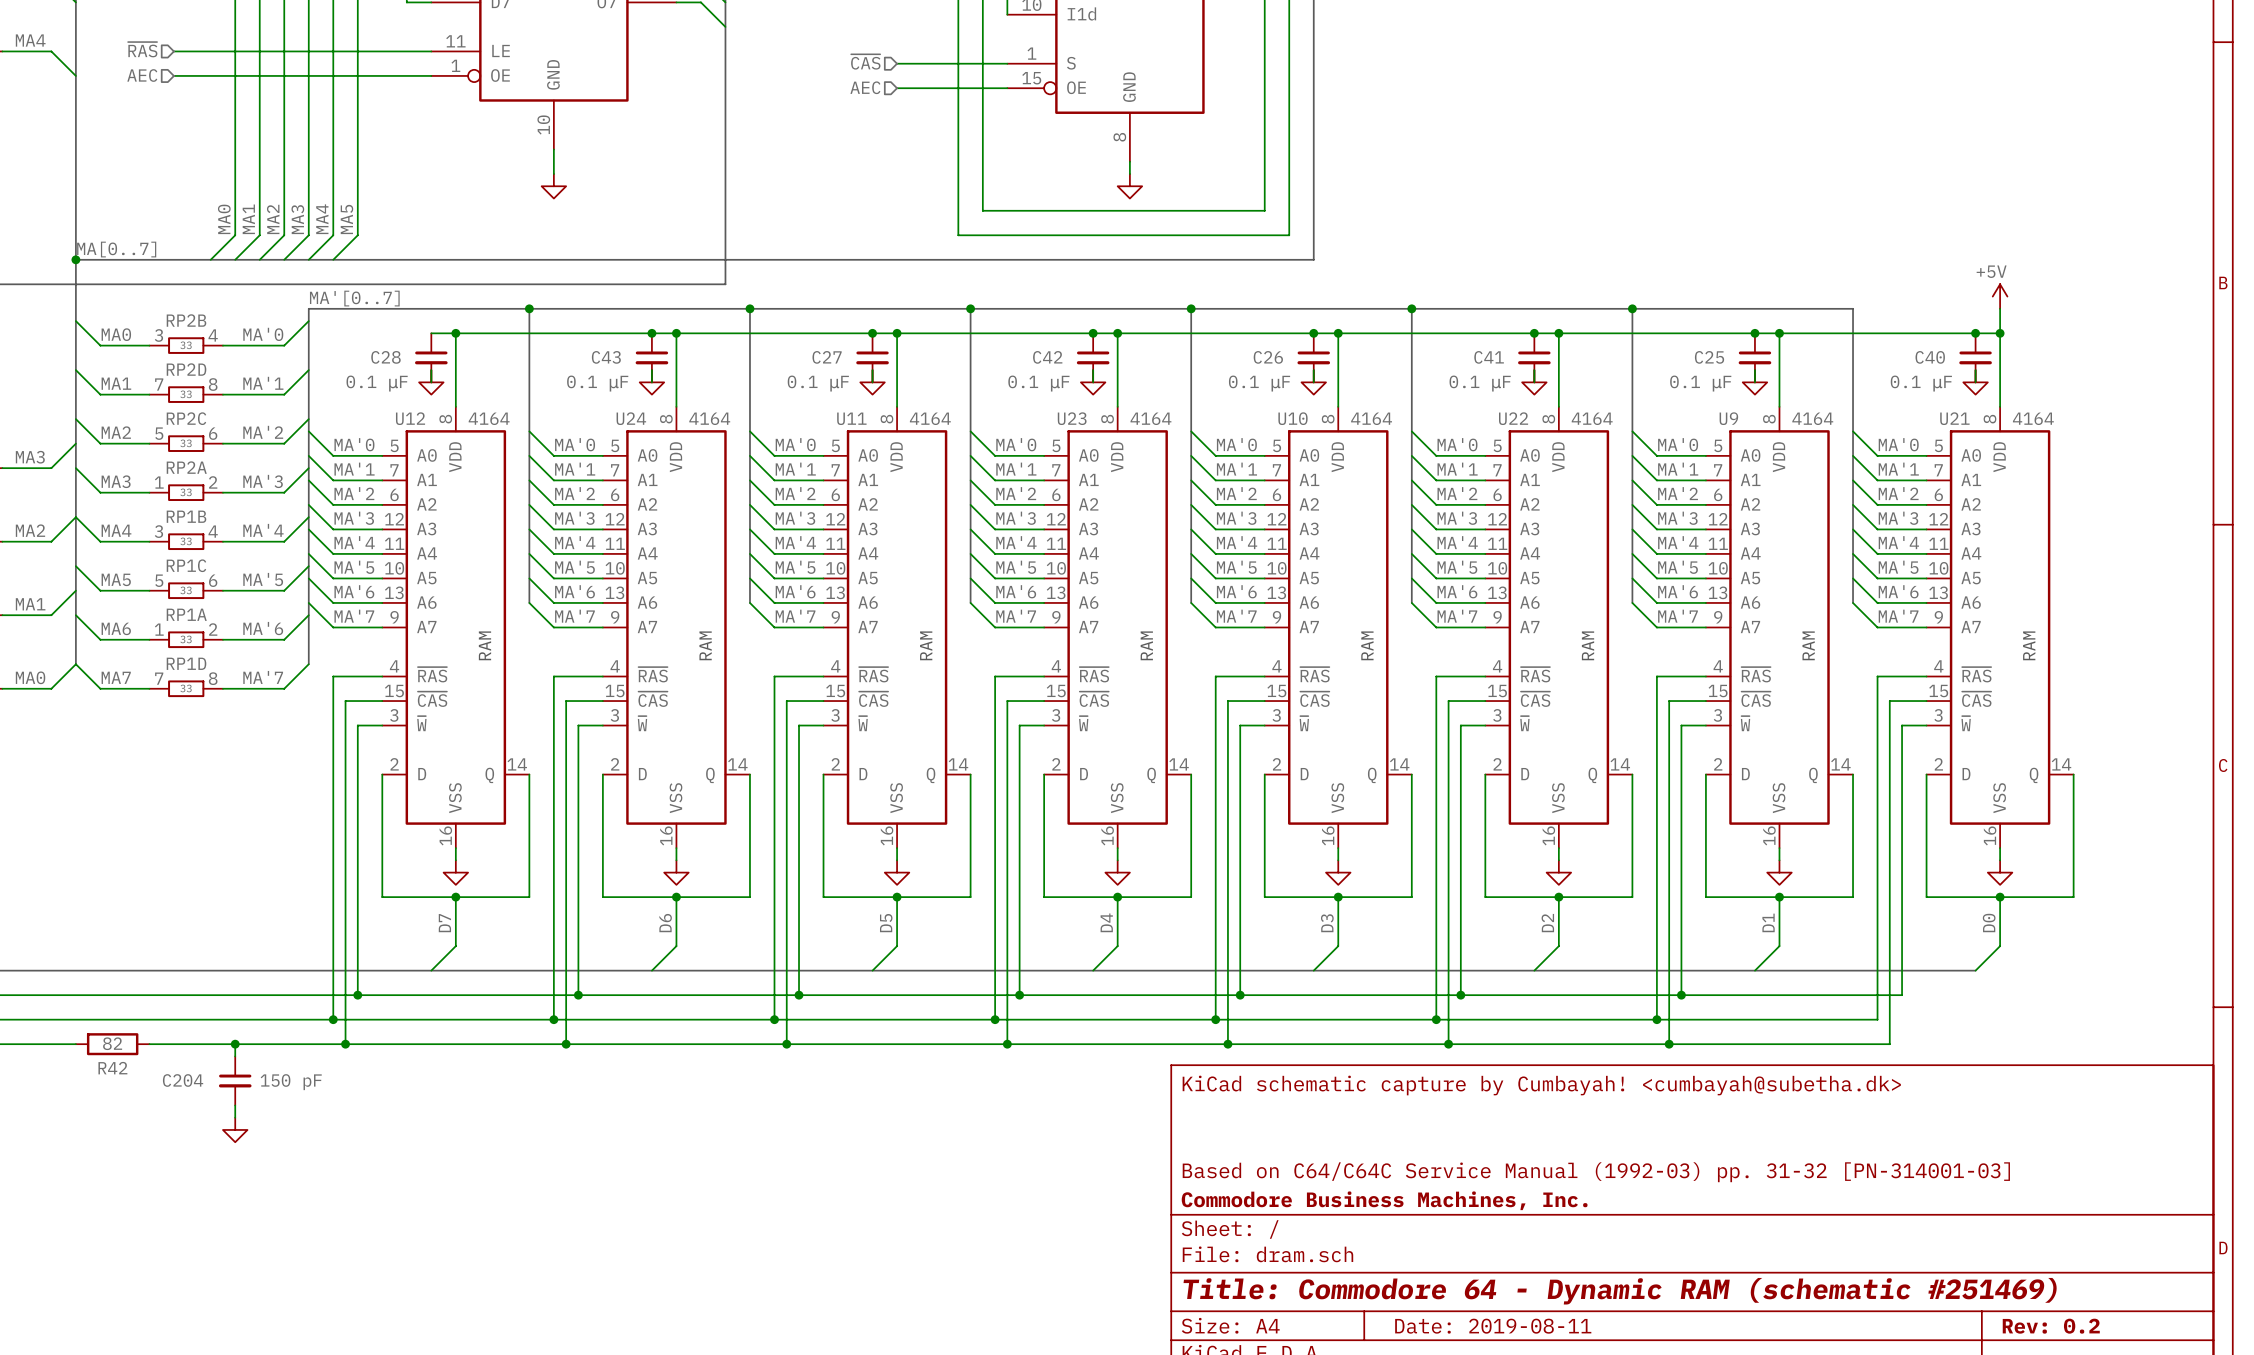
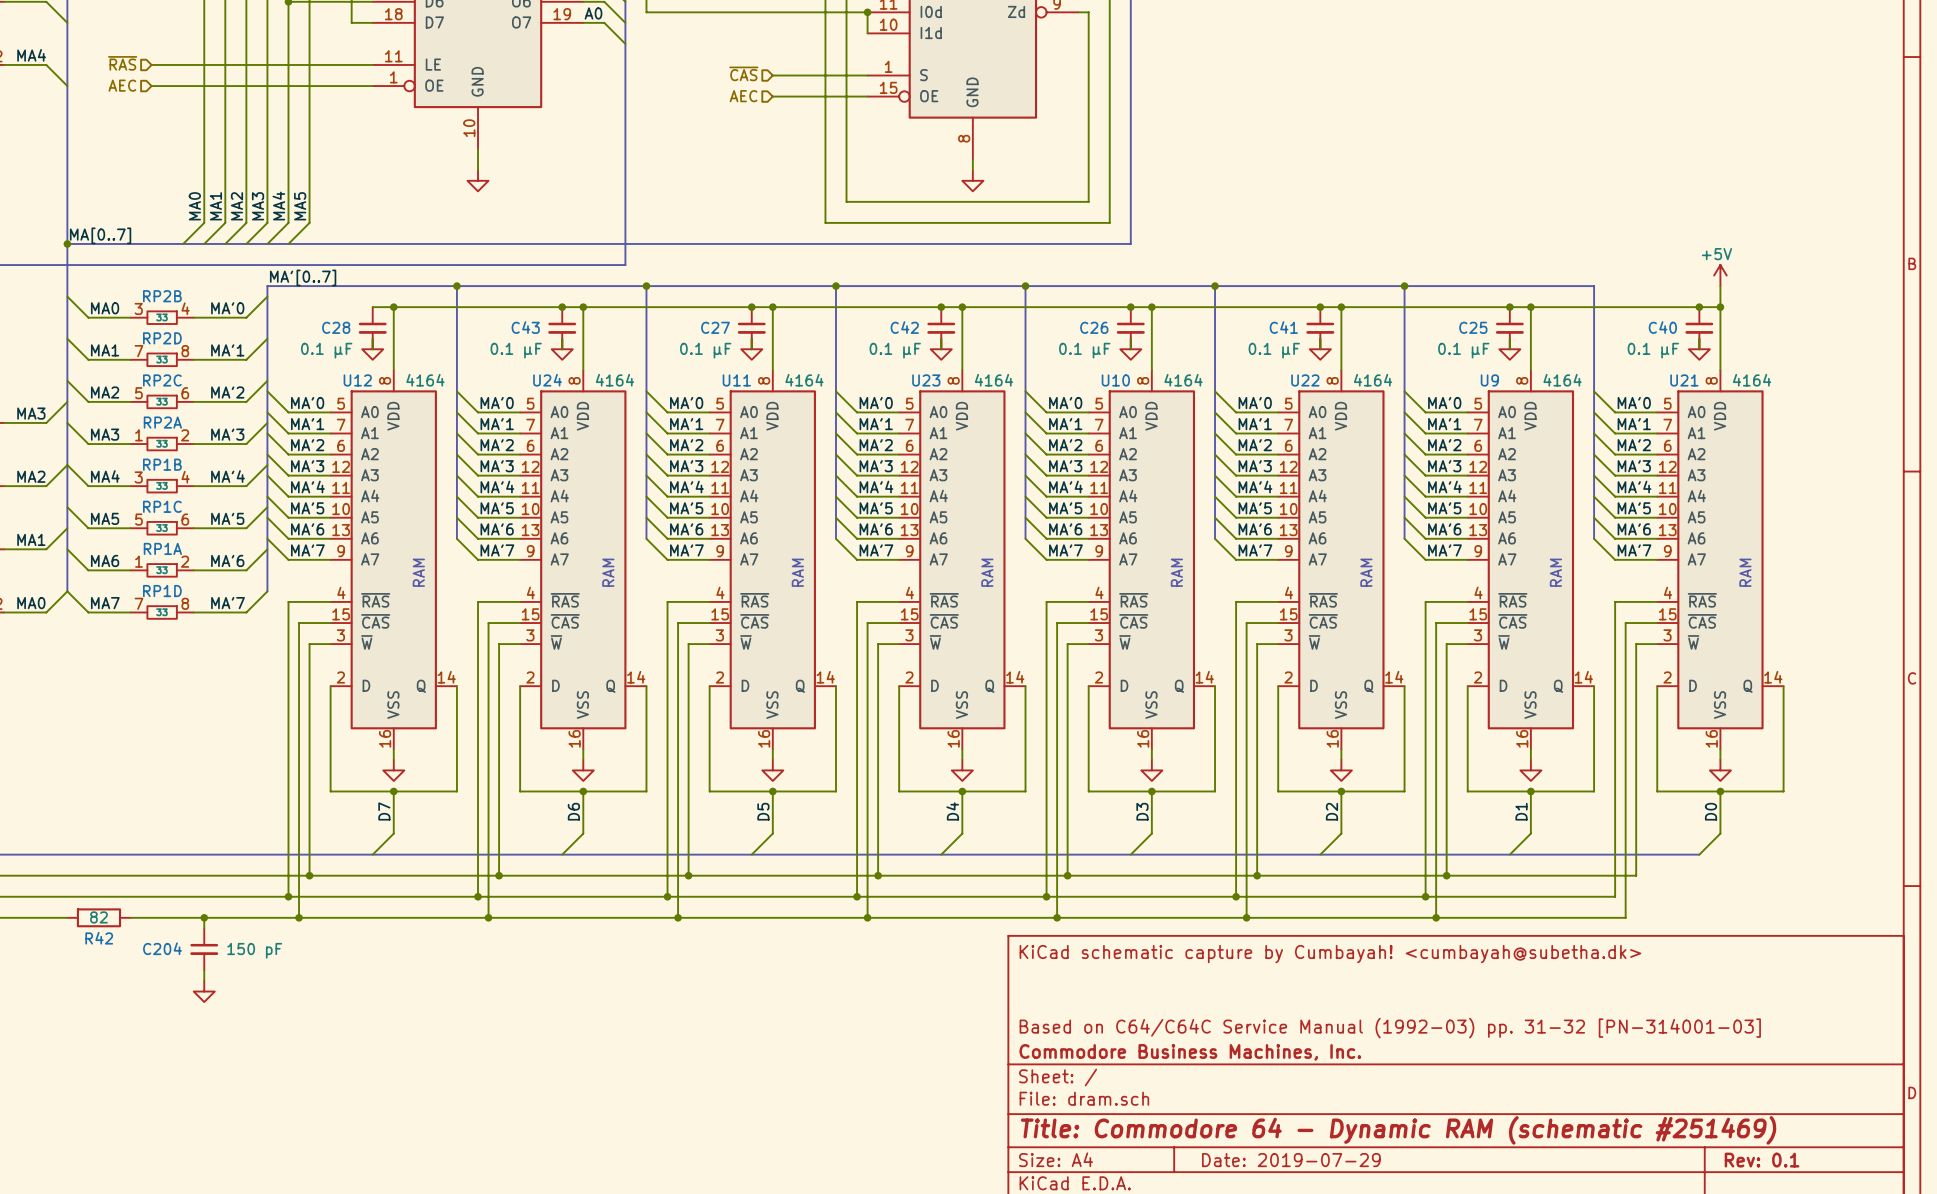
title block: Date: 2019-08-11 (1493, 1326) -> Date: 2019-07-29 (1291, 1160)
title block: Rev: 0.2 (2051, 1326) -> Rev: 0.1 (1762, 1160)

